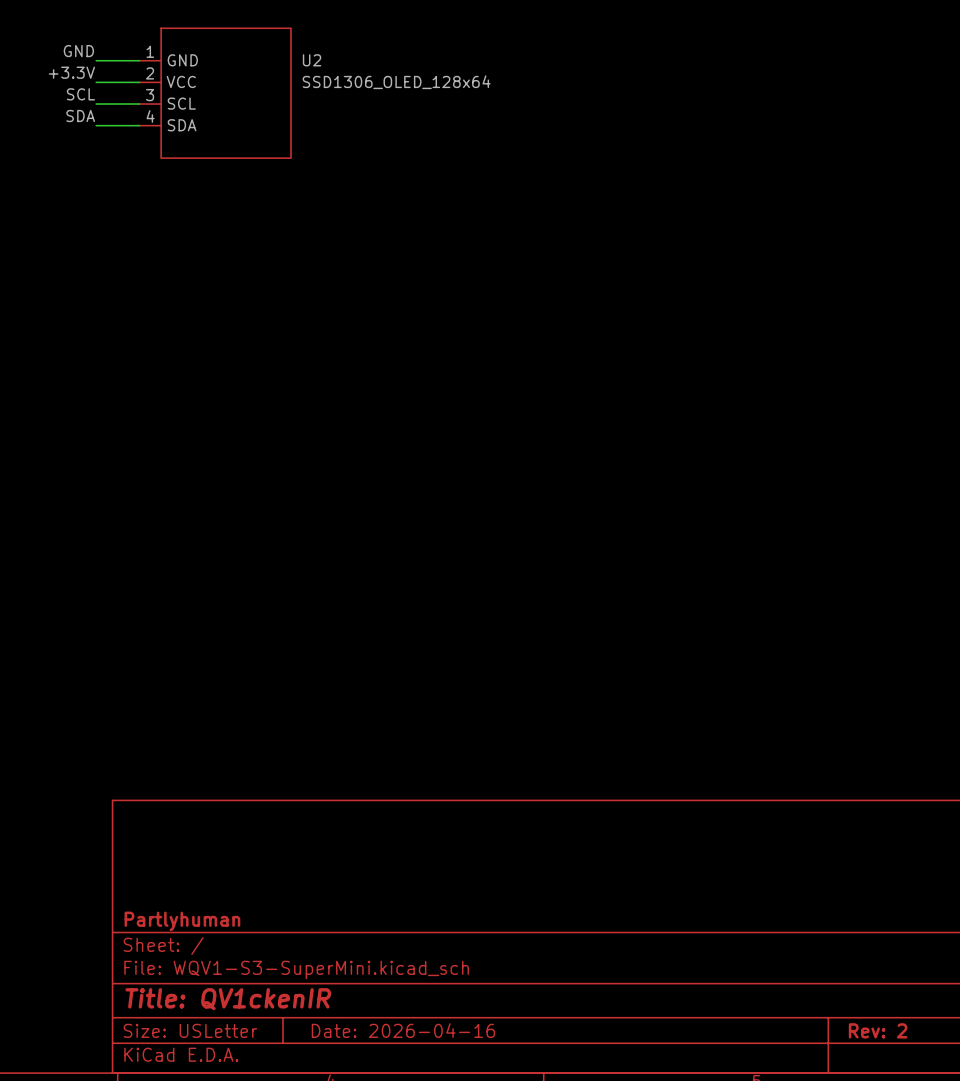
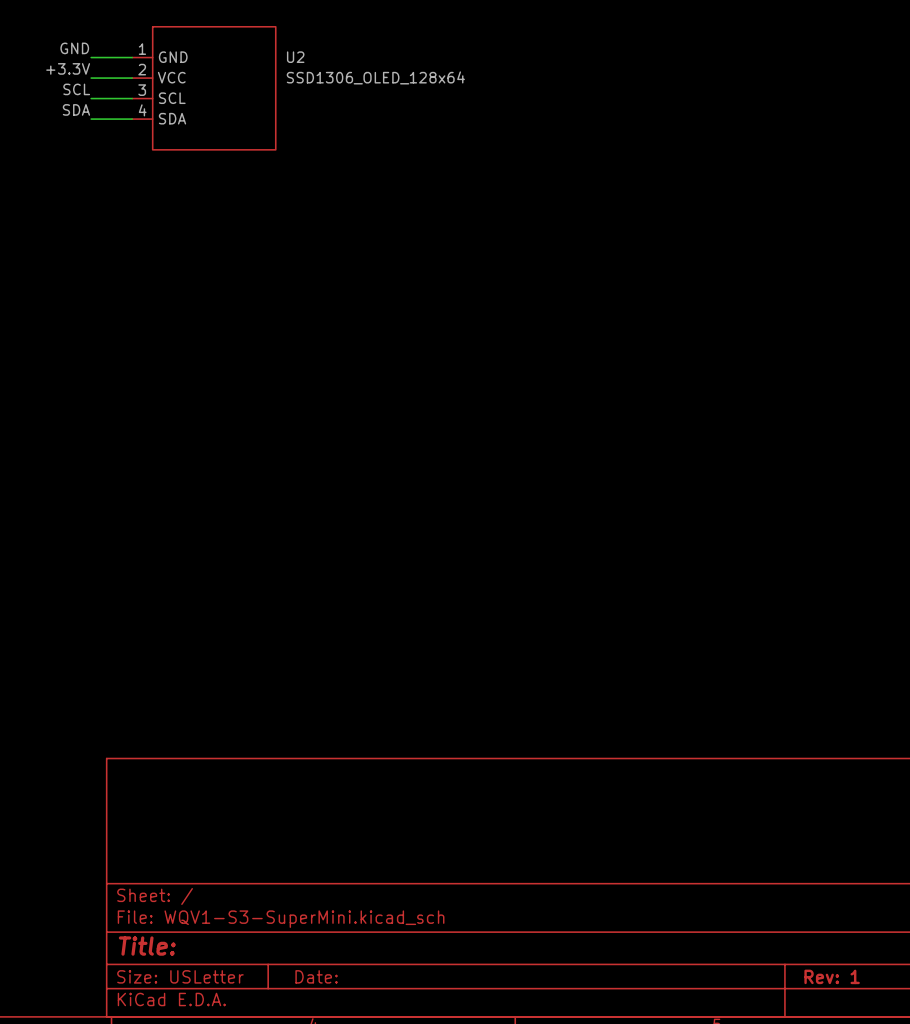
title block: Partlyhuman (182, 921) -> none
title block: Title: QV1ckenIR (228, 999) -> Title: (147, 946)
title block: Date: 2026-04-16 (403, 1030) -> Date: (316, 976)
title block: Rev: 2 (878, 1030) -> Rev: 1 (832, 976)

